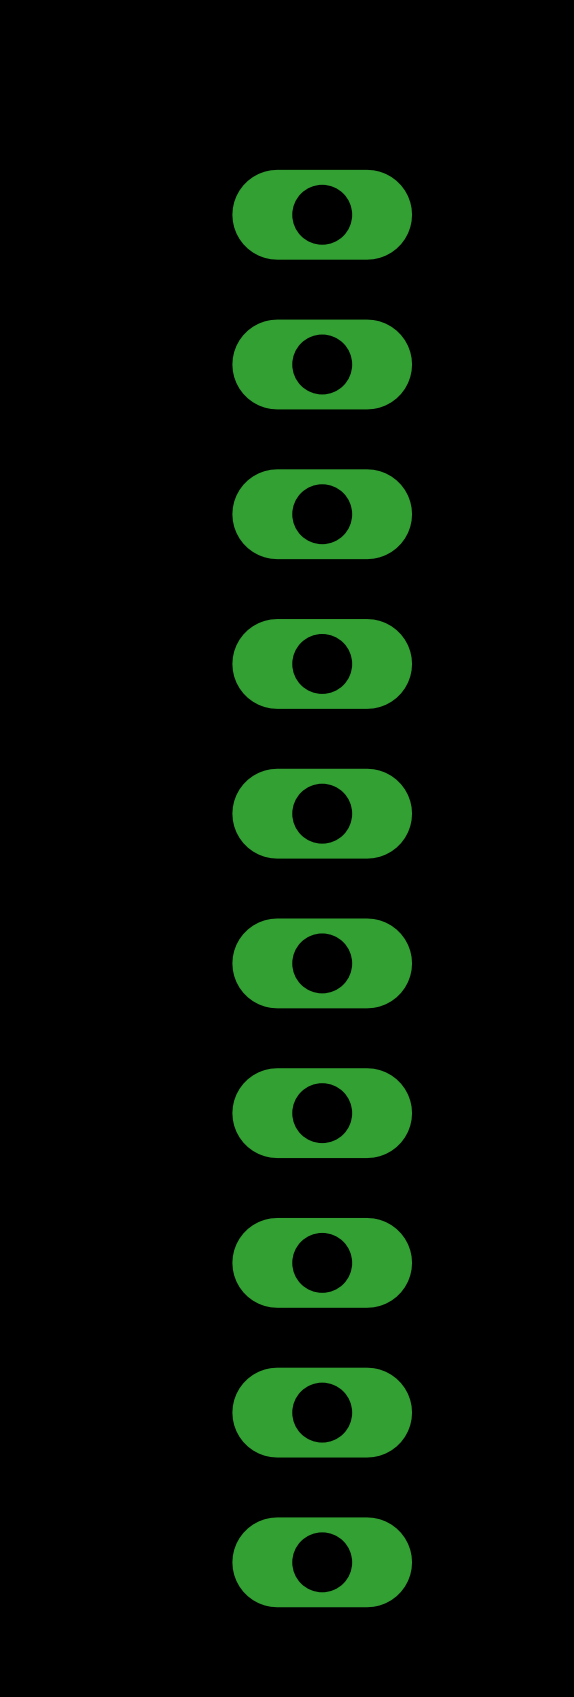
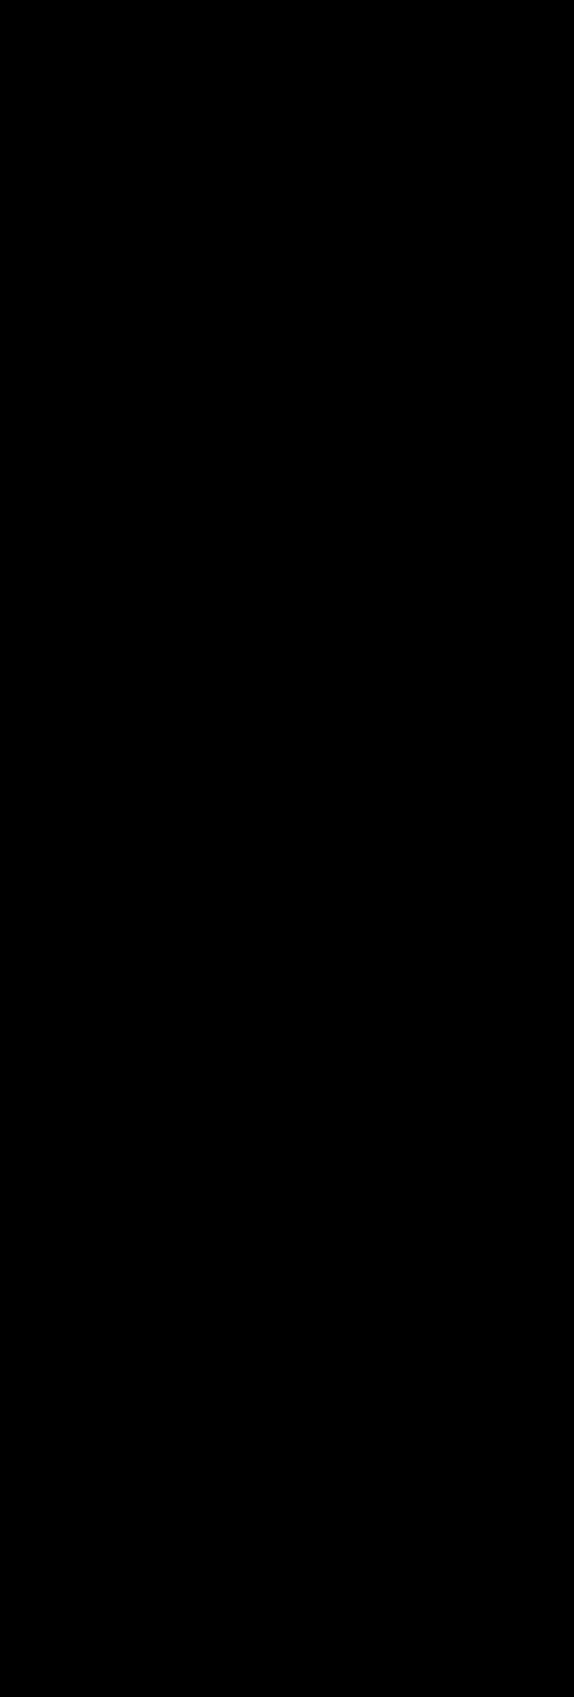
part: (322, 888) -> none

